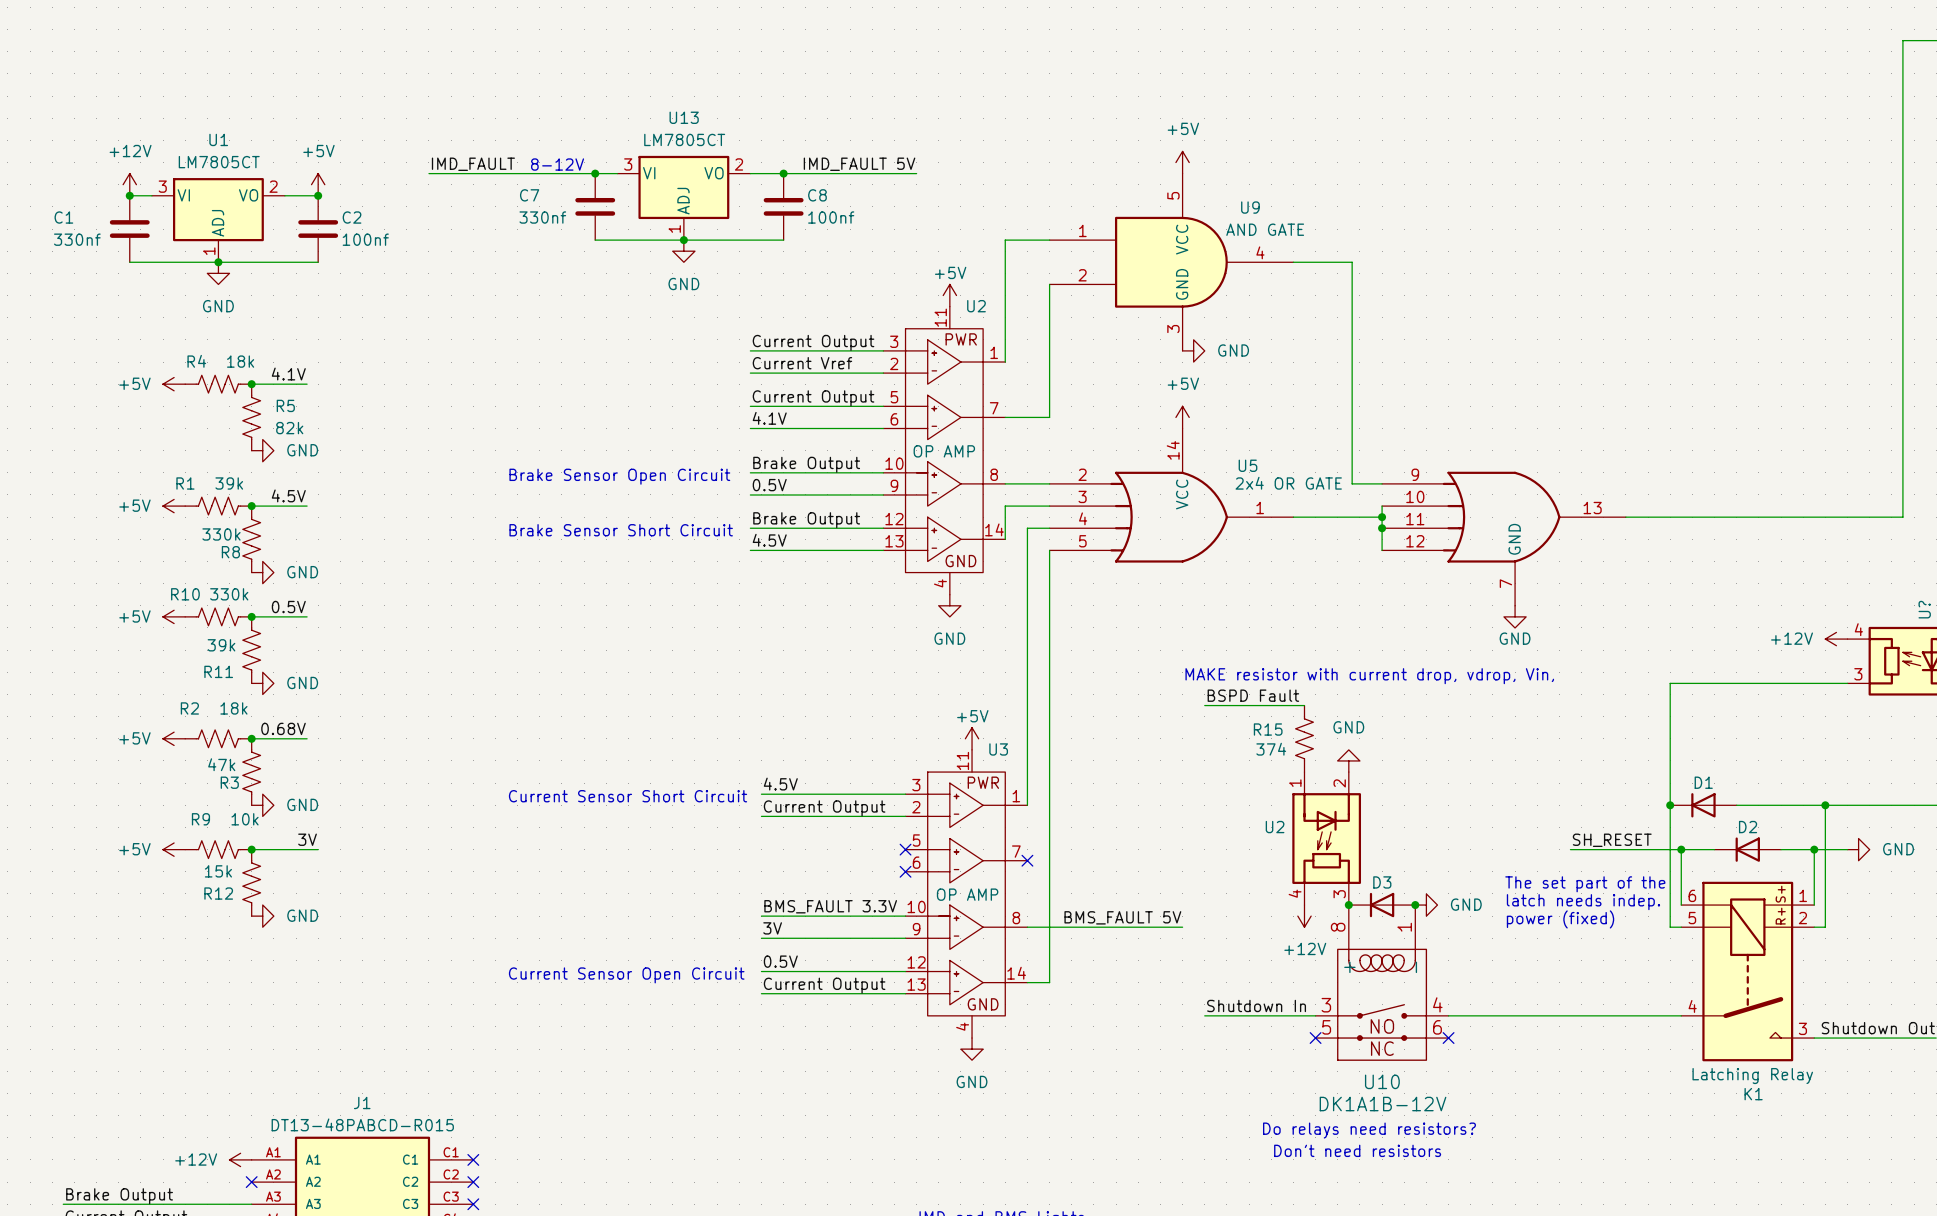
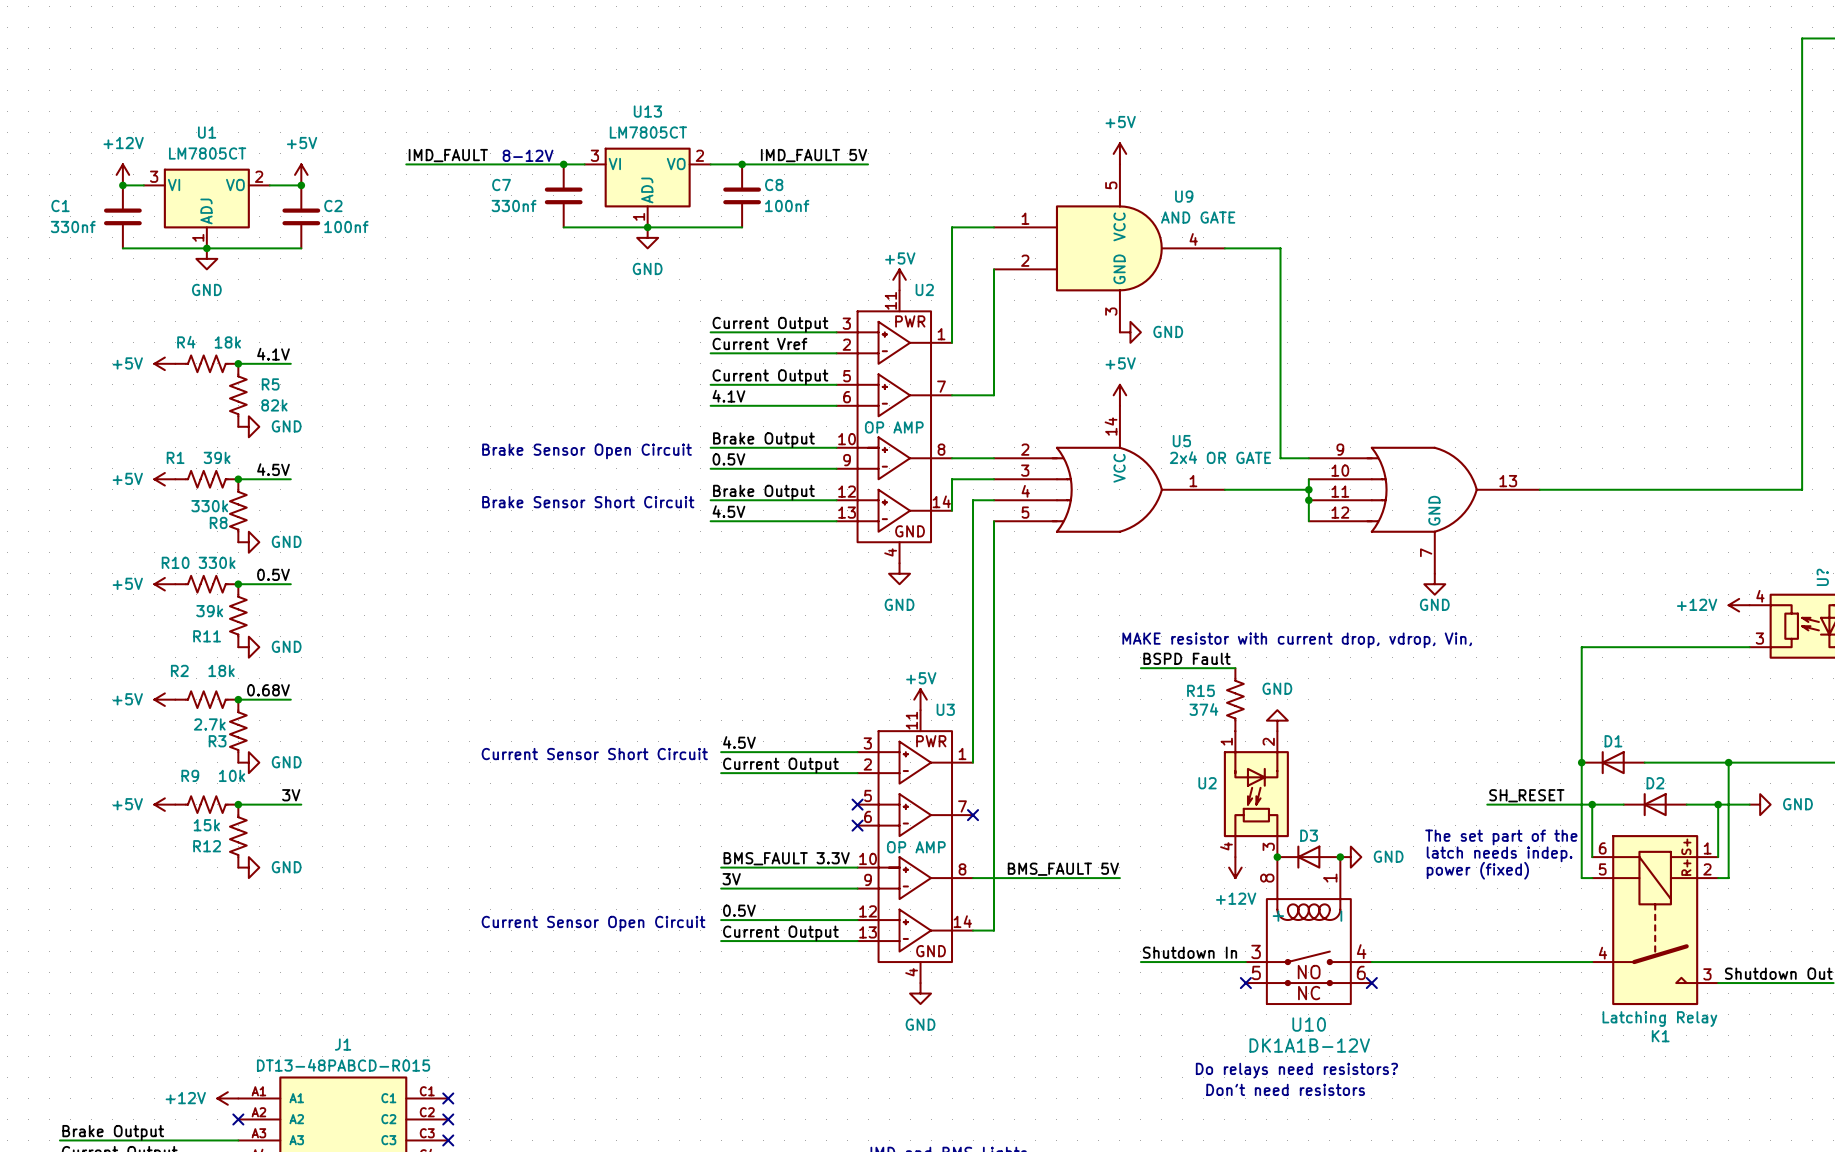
R3 value: 47k (221, 764) -> 2.7k (209, 724)

